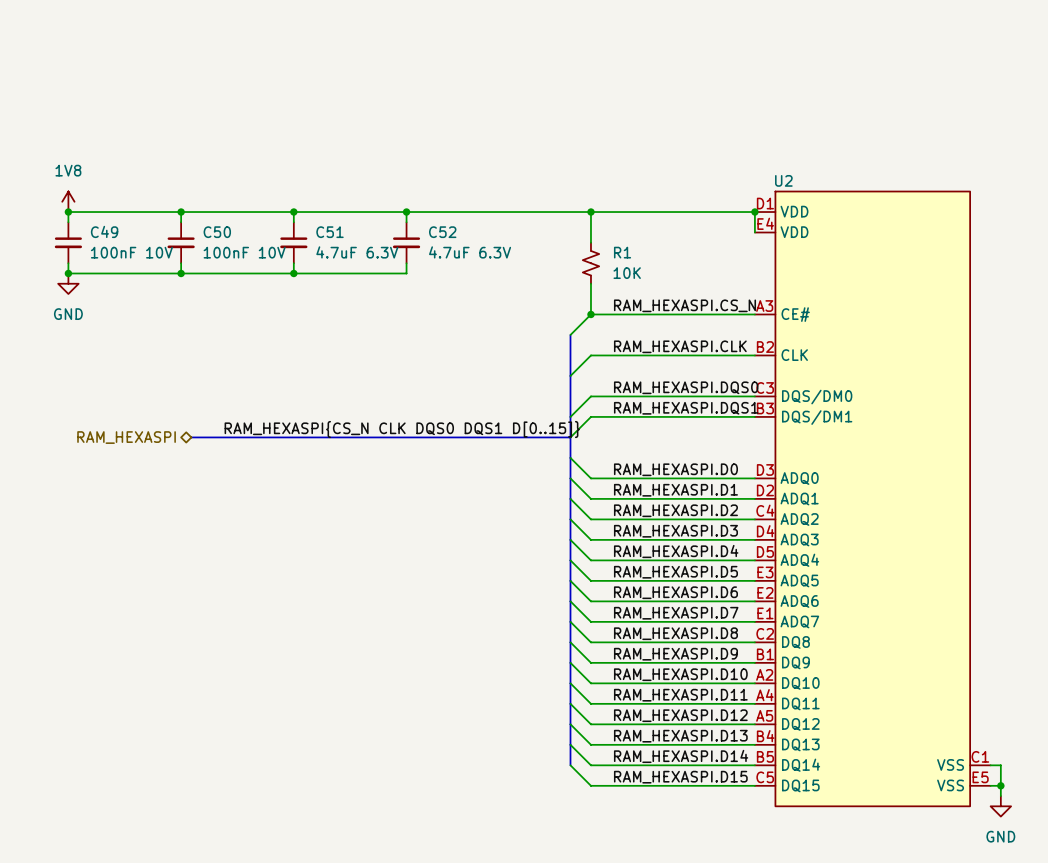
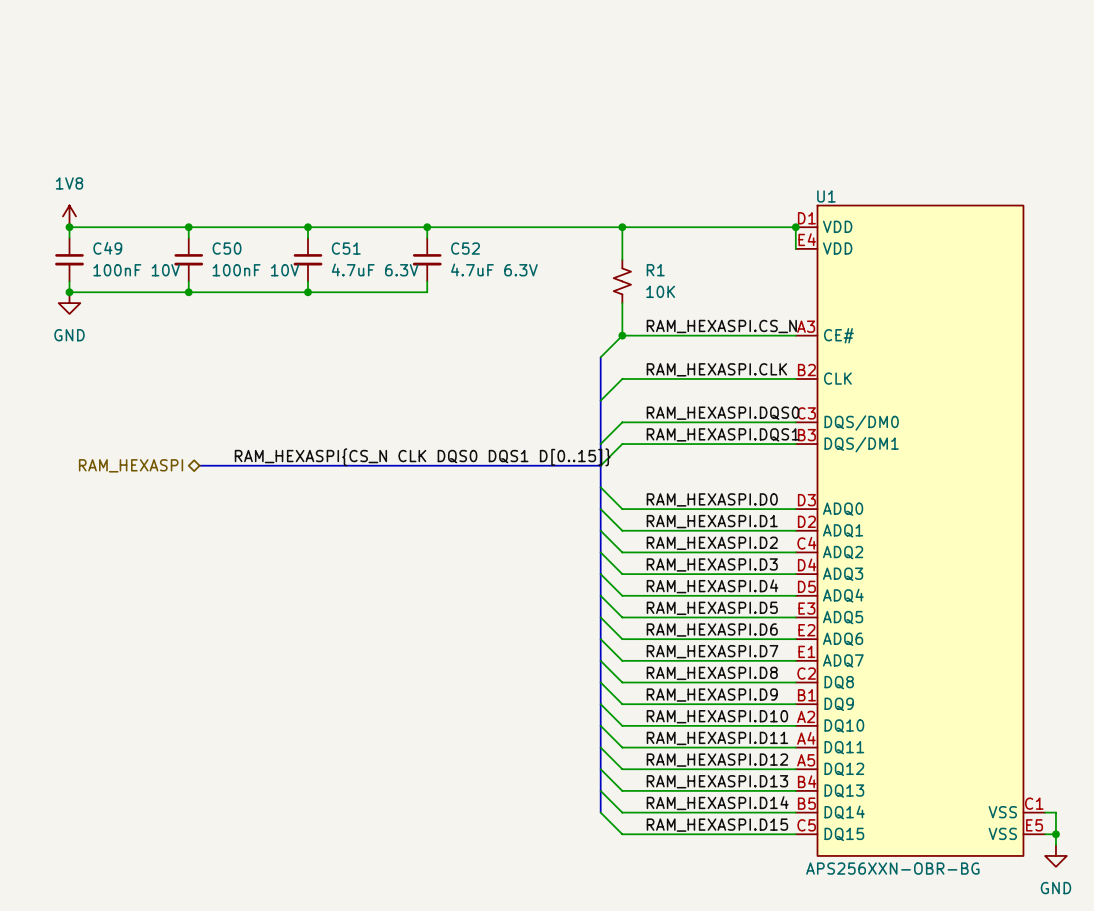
U2 name: U2 (783, 180) -> U1 (826, 196)
U2 value: none -> APS256XXN-OBR-BG (892, 868)

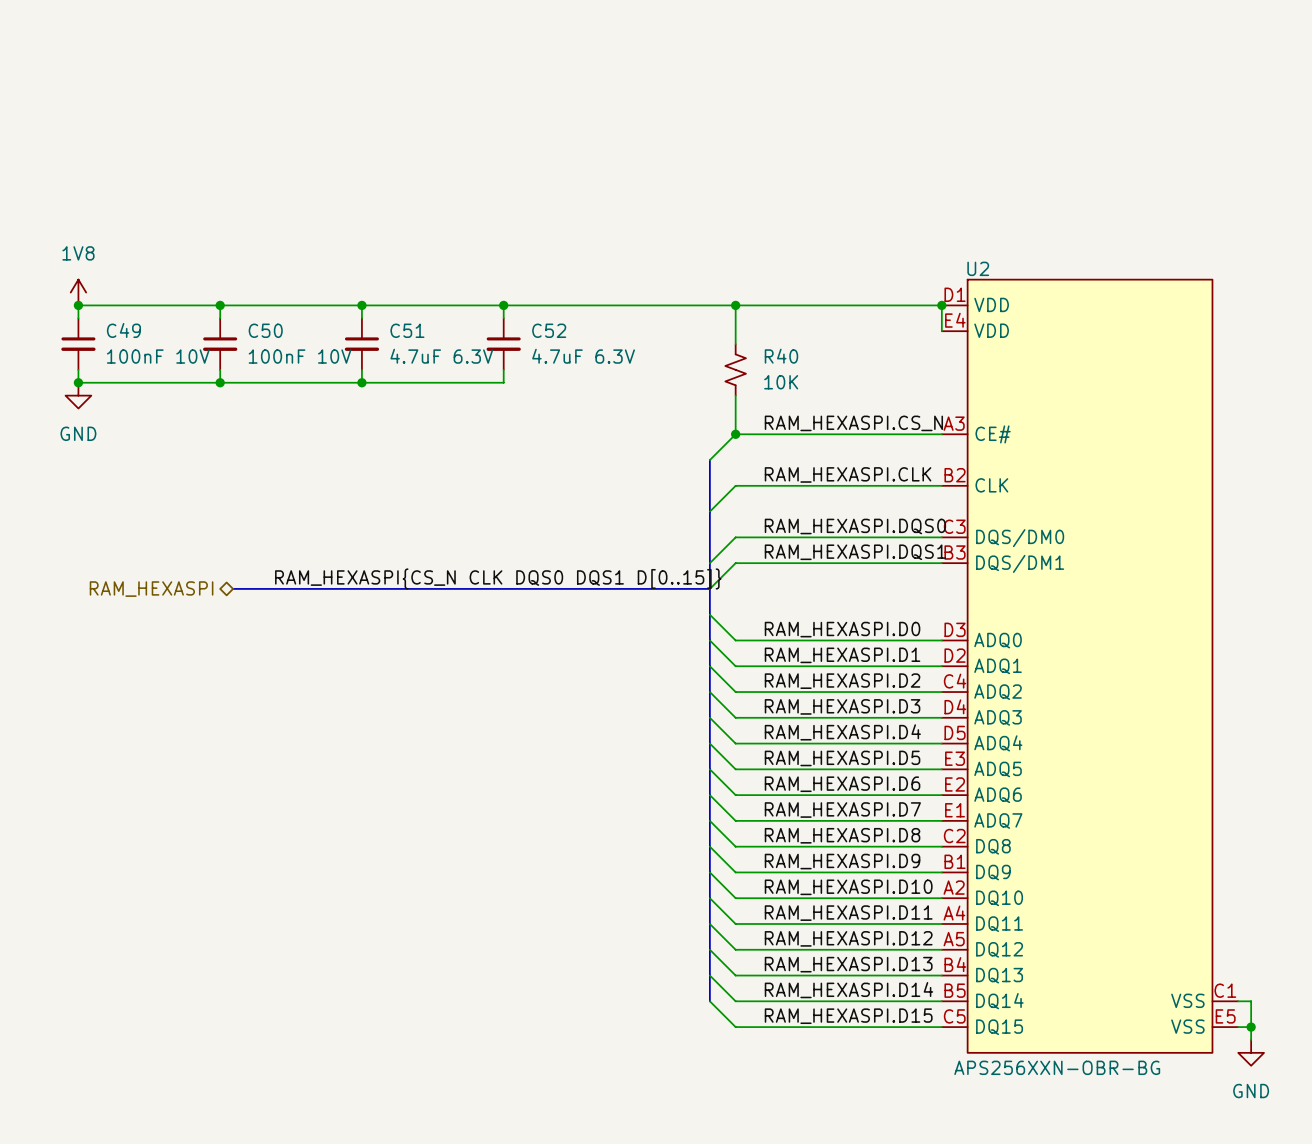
U1 name: U1 (826, 196) -> U2 (978, 268)
R1 name: R1 (655, 270) -> R40 (781, 356)

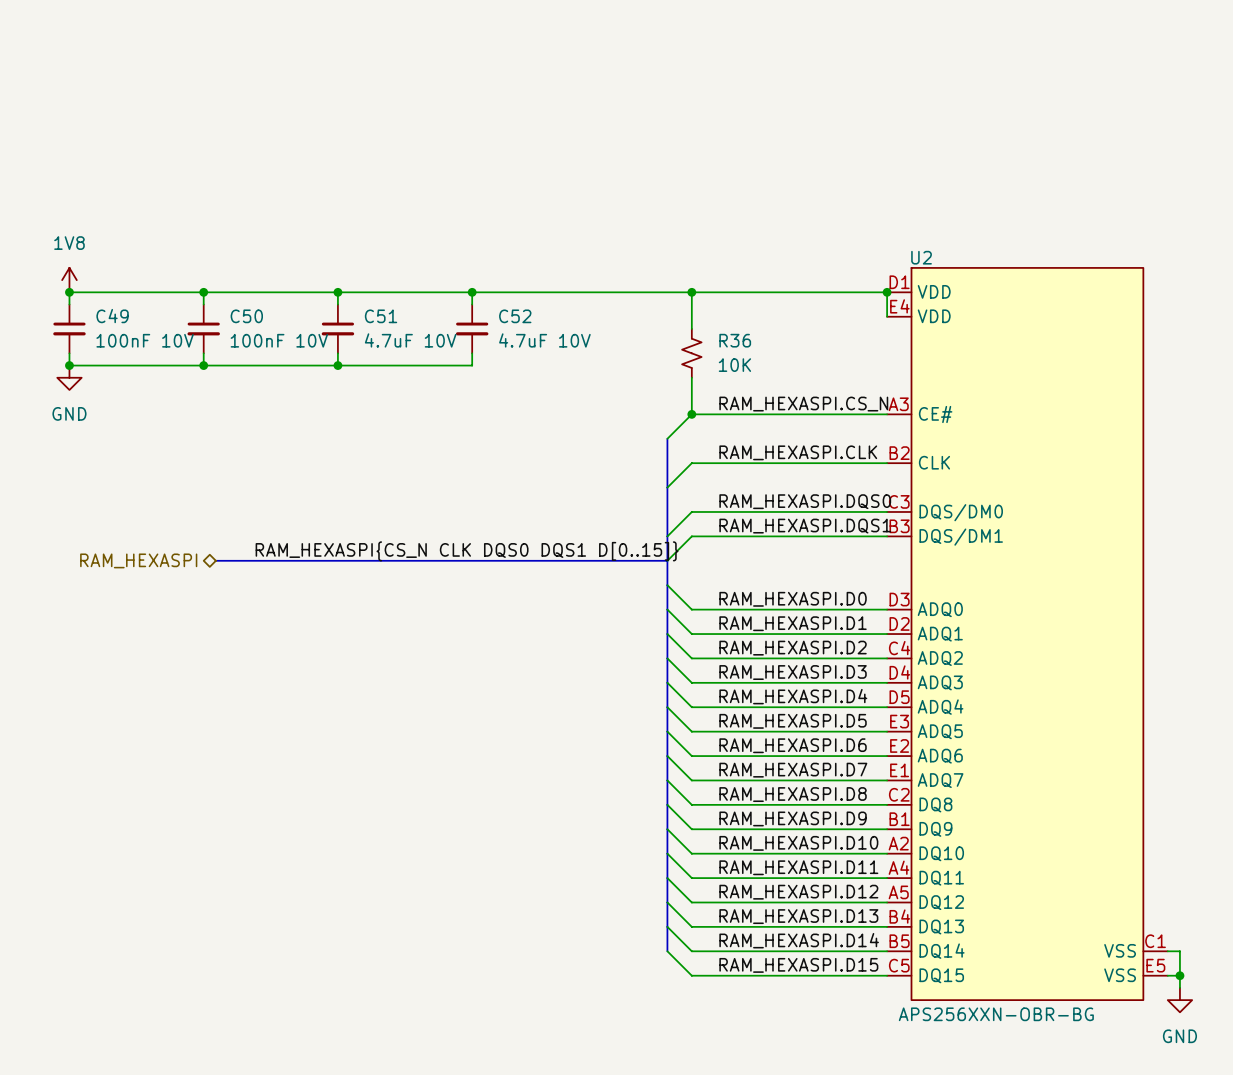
C51 value: 4.7uF 6.3V (441, 356) -> 4.7uF 10V (410, 340)
C52 value: 4.7uF 6.3V (583, 356) -> 4.7uF 10V (544, 340)
R40 name: R40 (781, 356) -> R36 (735, 340)

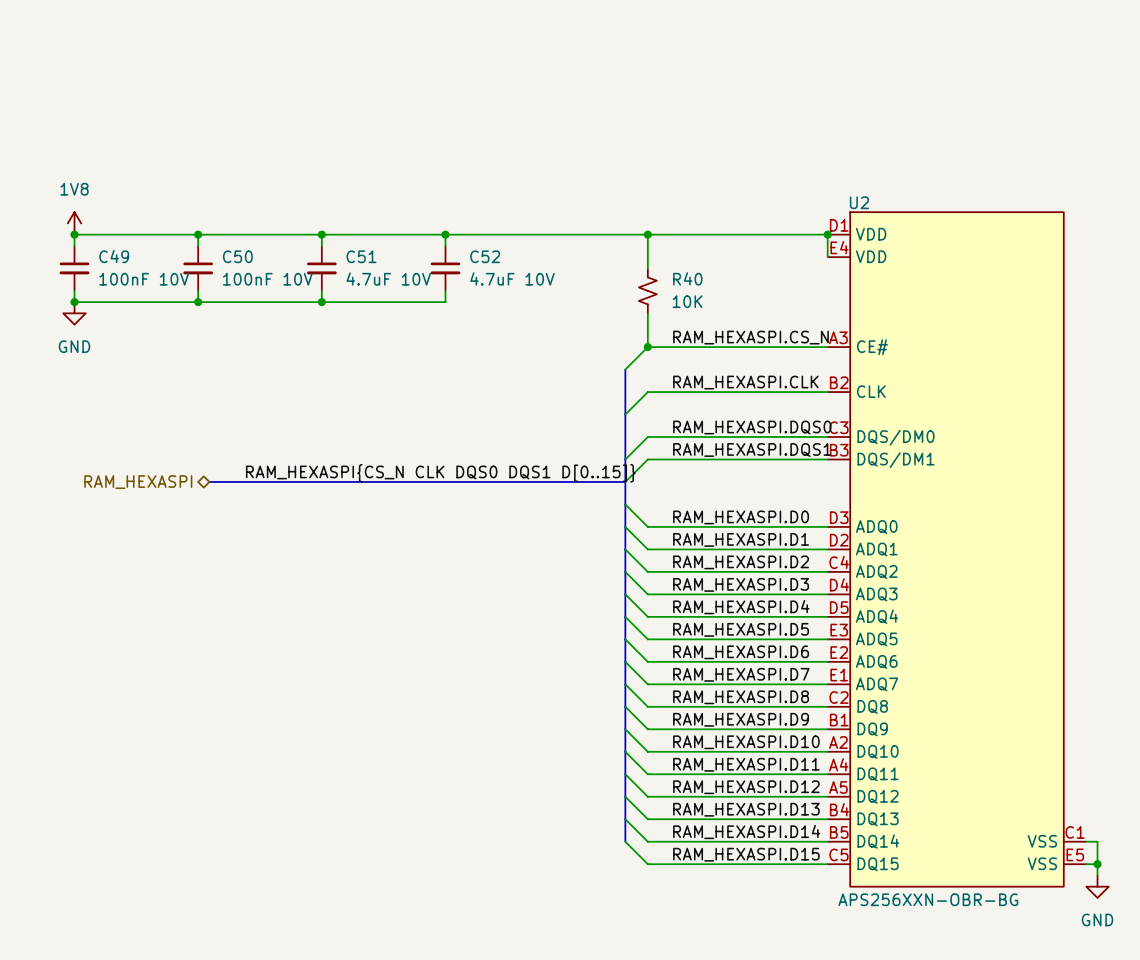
R36 name: R36 (735, 340) -> R40 (687, 278)

